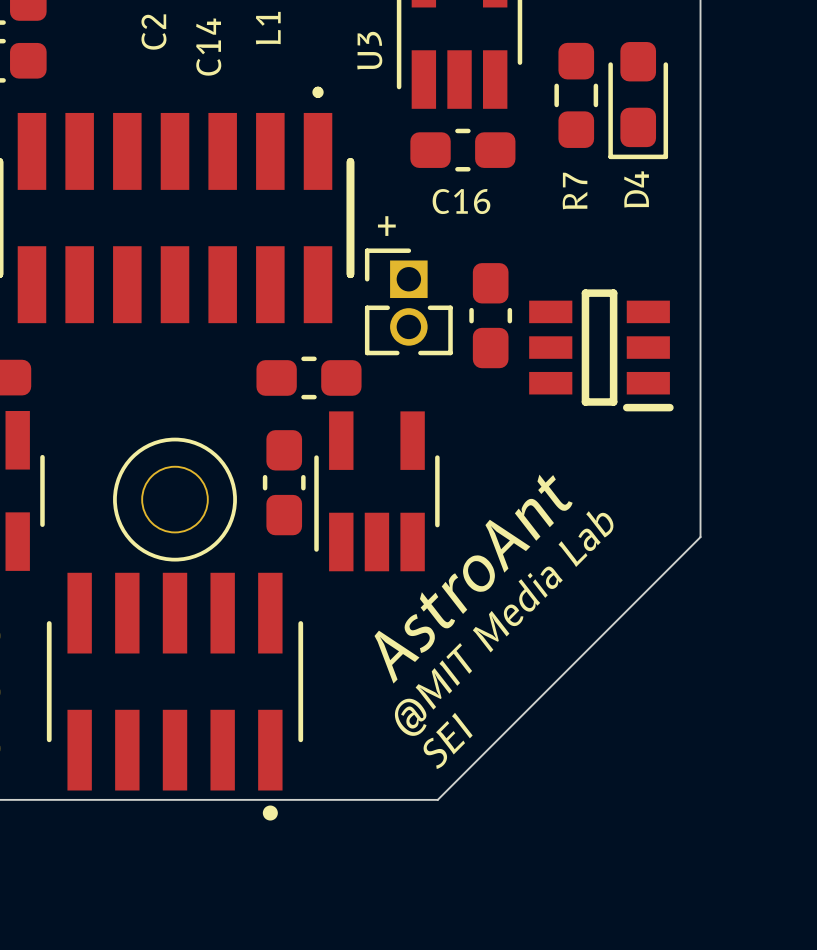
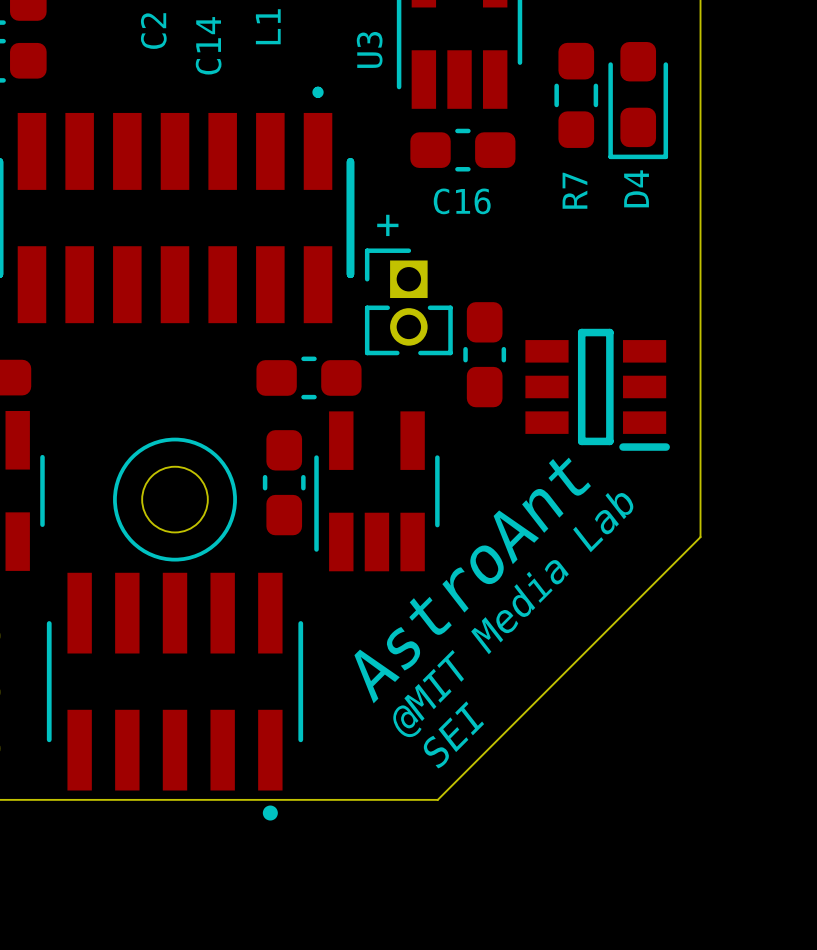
part position: (490, 315) -> (484, 354)
part position: (601, 350) -> (597, 389)

